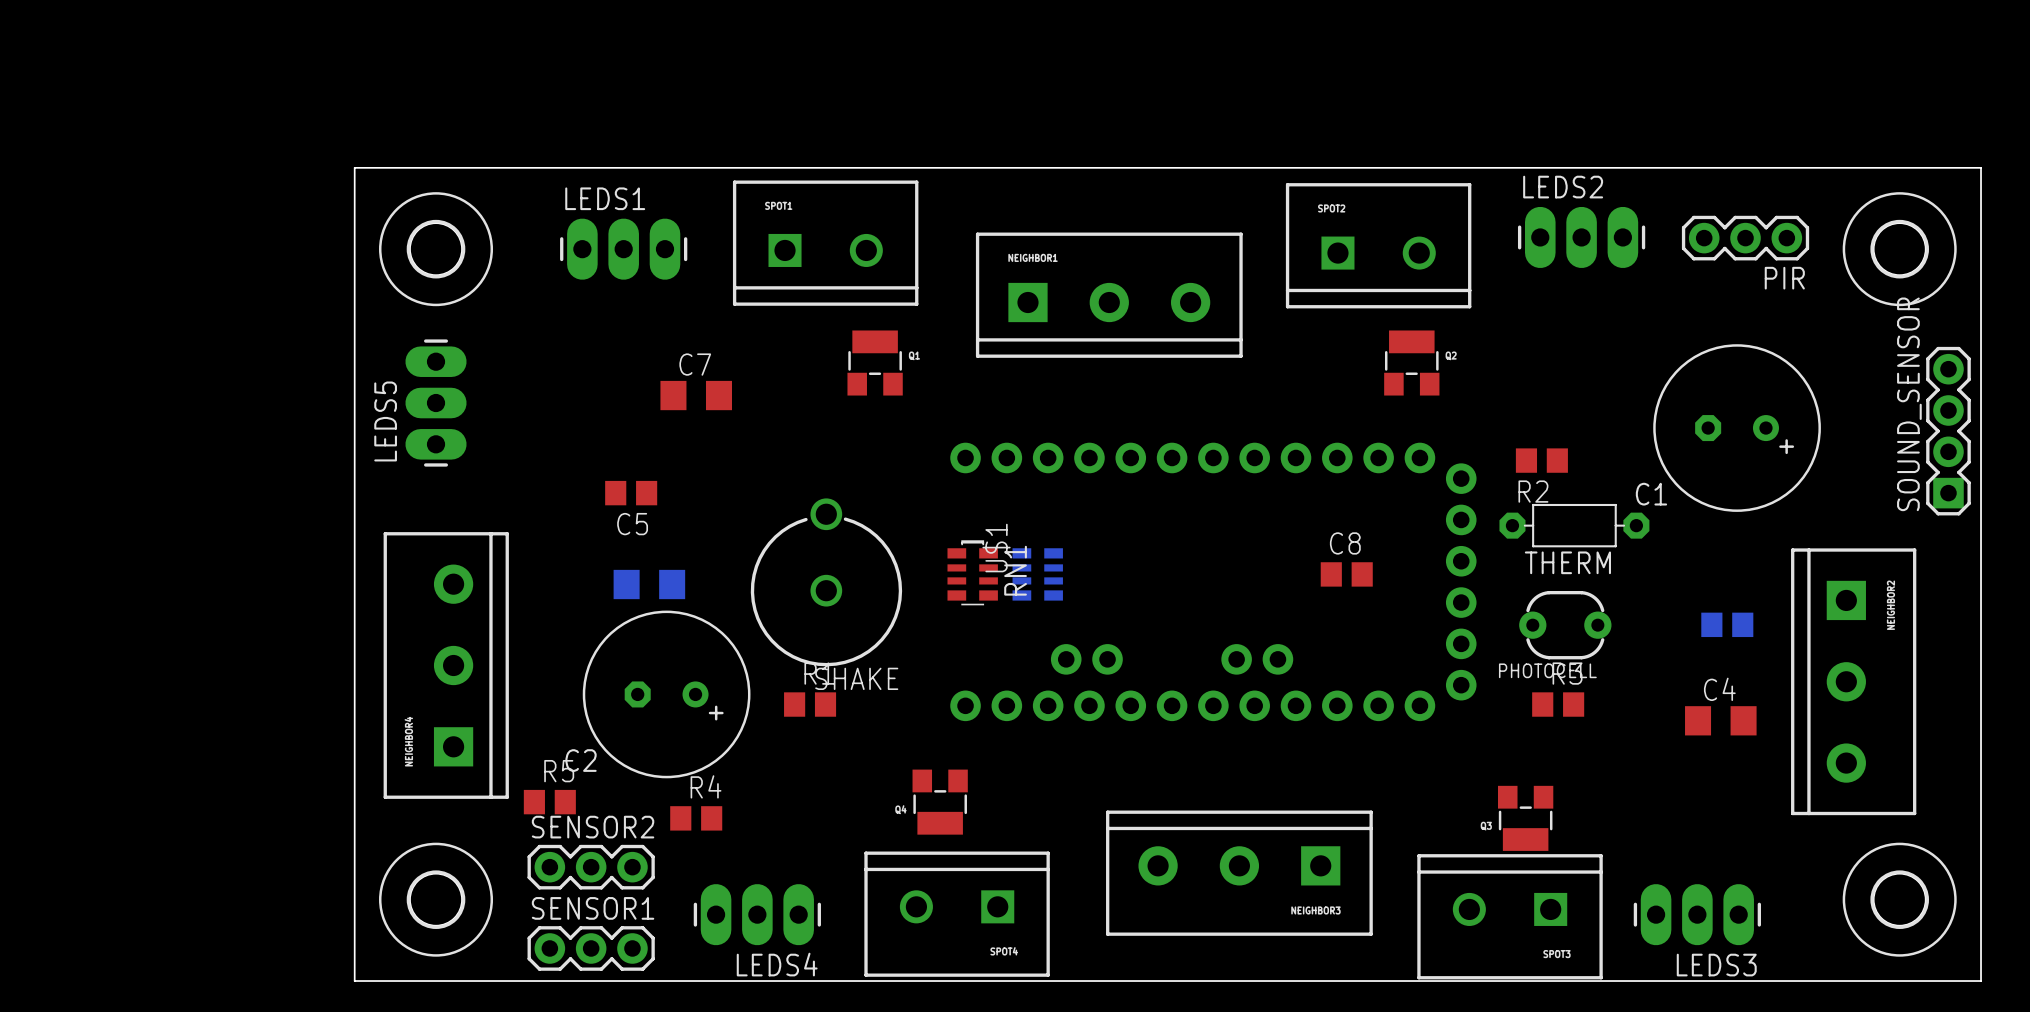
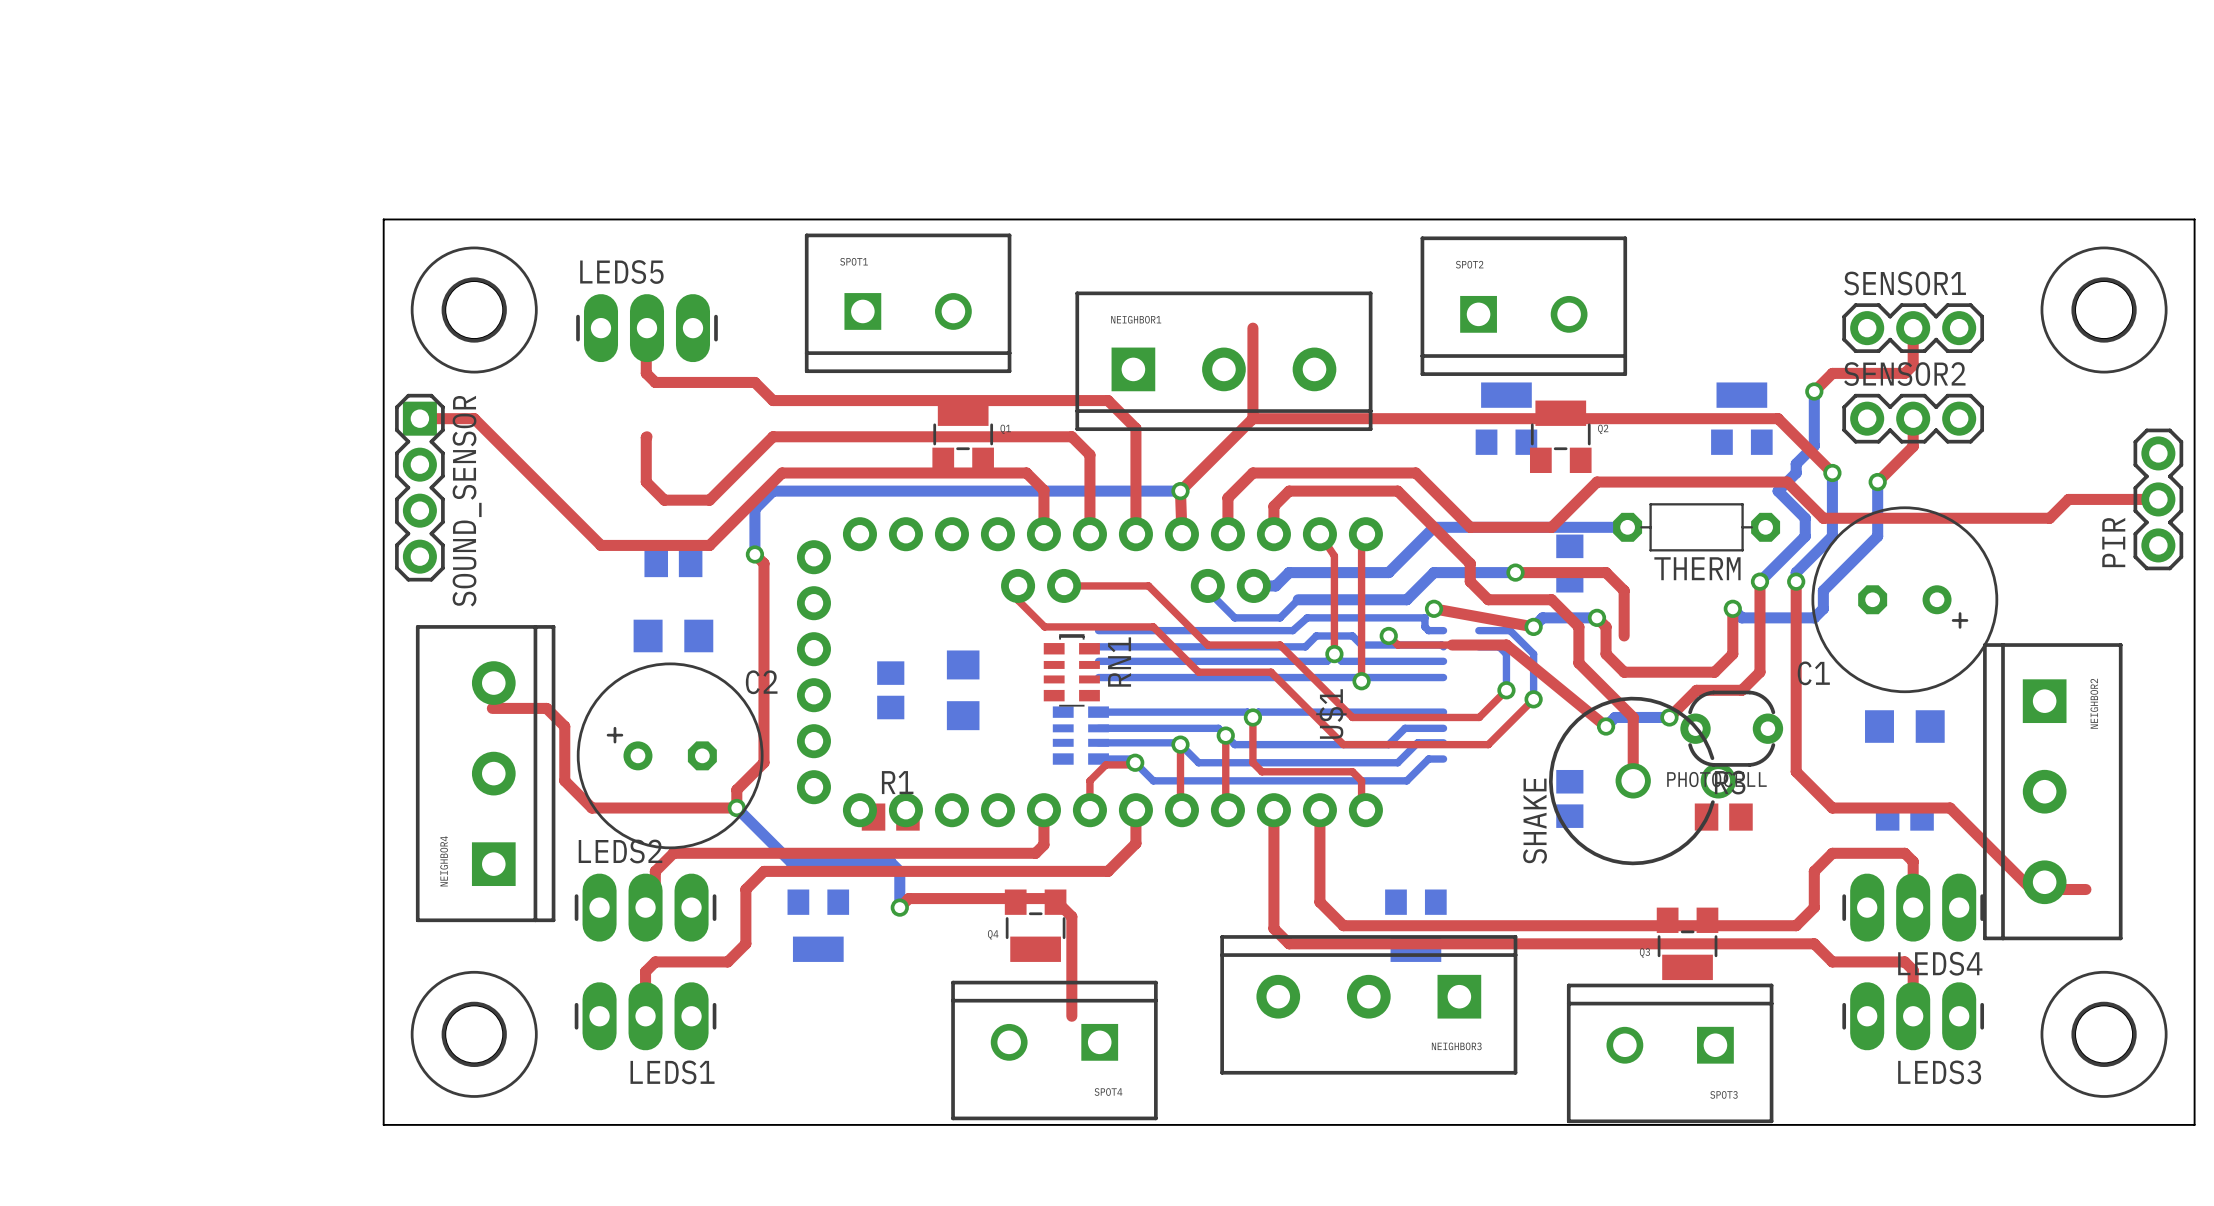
LEDS1 name position: LEDS1 (605, 198) -> LEDS1 (672, 1072)
LEDS2 position: (1581, 237) -> (645, 907)
PIR rotation: 0° (1745, 238) -> 90° clockwise (2158, 499)
PIR position: (1745, 238) -> (2158, 499)
LEDS1 position: (623, 249) -> (645, 1016)
top track: none -> (646, 328) (646, 373) (655, 382) (754, 382) (773, 400) (1108, 400) (1135, 428) (1135, 534)
top track: none -> (1252, 328) (1252, 418)
top track: none -> (1913, 328) (1913, 365) (1904, 373) (1832, 373) (1814, 391)
bottom track: none -> (1814, 391) (1814, 445) (1796, 463) (1796, 472) (1778, 491) (1805, 518) (1805, 536) (1759, 581)
via: none -> (1814, 391)
top track: none -> (419, 418) (474, 418) (601, 545) (709, 545) (782, 472) (1026, 472) (1043, 490) (1043, 534)
top track: none -> (1252, 418) (1778, 418) (1832, 472)
top track: none -> (1252, 418) (1180, 491) (1181, 534)
part: none -> (1506, 418)
part: none -> (1741, 418)
top track: none -> (1913, 418) (1913, 446) (1877, 482)
top track: none -> (646, 436) (646, 482) (664, 500) (709, 500) (773, 436) (1071, 436) (1089, 454) (1089, 534)
C7 side: top (696, 395) -> bottom (963, 690)
bottom track: none -> (1832, 472) (1832, 536) (1796, 572) (1796, 581)
via: none -> (1832, 472)
LEDS5 rotation: 0° (436, 403) -> 90° clockwise (646, 328)
LEDS5 position: (436, 403) -> (646, 328)
bottom track: none -> (1877, 482) (1877, 536) (1823, 590) (1823, 608) (1814, 617) (1741, 617) (1732, 608)
via: none -> (1877, 482)
SOUND_SENSOR: none -> (419, 487)
bottom track: none -> (1180, 491) (773, 491) (754, 509) (754, 554)
via: none -> (1180, 491)
top track: none -> (2158, 499) (2068, 499) (2049, 518) (1823, 518) (1787, 482) (1596, 482) (1551, 527) (1470, 527) (1415, 472) (1252, 472) (1227, 497) (1227, 534)
C1 position: (1737, 428) -> (1904, 599)
SOUND_SENSOR: (1948, 431) -> none
bottom track: none -> (1627, 527) (1434, 527) (1388, 572) (1289, 572) (1275, 585) (1253, 585)
top track: none -> (1273, 534) (1273, 506) (1289, 491) (1397, 491) (1470, 563) (1470, 581) (1488, 599) (1551, 599) (1578, 626) (1578, 663) (1633, 717) (1633, 780)
top track: none -> (1319, 534) (1334, 555) (1334, 654)
top track: none -> (1365, 534) (1361, 538) (1361, 681)
R2 side: top (1541, 460) -> bottom (1569, 563)
top track: none -> (754, 554) (763, 563) (763, 762) (736, 789) (736, 808) (591, 808) (564, 780) (564, 726) (546, 708) (492, 708)
via: none -> (754, 554)
top track: none -> (1515, 572) (1606, 572) (1624, 590) (1624, 635)
bottom track: none -> (1515, 572) (1434, 572) (1406, 599) (1298, 599) (1280, 617) (1234, 617) (1207, 590) (1207, 585)
via: none -> (1515, 572)
C5 side: top (631, 493) -> bottom (673, 563)
top track: none -> (1759, 581) (1759, 672) (1741, 690) (1696, 690) (1669, 717)
via: none -> (1759, 581)
top track: none -> (1796, 581) (1796, 771) (1832, 808) (1950, 808) (2031, 889) (2085, 889)
via: none -> (1796, 581)
top track: none -> (1018, 585) (1018, 600) (1044, 626) (1153, 626) (1198, 672) (1271, 672) (1343, 744) (1488, 744) (1533, 699)
top track: none -> (1064, 585) (1148, 585) (1207, 645) (1280, 645) (1352, 717) (1479, 717) (1506, 690)
top track: none -> (1434, 608) (1533, 626)
via: none -> (1434, 608)
top track: none -> (1732, 608) (1732, 654) (1714, 672) (1624, 672) (1606, 654) (1606, 626) (1596, 617)
via: none -> (1732, 608)
bottom track: none -> (1596, 617) (1542, 617) (1533, 626)
via: none -> (1596, 617)
THERM position: (1574, 525) -> (1696, 527)
via: none -> (1533, 626)
bottom track: none -> (1098, 630) (1292, 630) (1307, 617) (1424, 617) (1424, 626) (1428, 630) (1443, 630)
bottom track: none -> (1478, 630) (1510, 630) (1533, 654) (1533, 699)
top track: none -> (1388, 635) (1397, 645) (1506, 645) (1606, 726)
via: none -> (1388, 635)
bottom track: none -> (1098, 646) (1305, 646) (1316, 635) (1352, 635) (1361, 645) (1441, 645) (1443, 646)
bottom track: none -> (1478, 646) (1499, 646) (1506, 654) (1506, 690)
via: none -> (1334, 654)
bottom track: none -> (1098, 661) (1327, 661) (1334, 654) (1341, 661) (1443, 661)
part position: (1037, 574) -> (1080, 735)
C8: (1346, 574) -> none
bottom track: none -> (1098, 677) (1356, 677) (1361, 681) (1366, 677) (1443, 677)
U$1 rotation: 0° (1213, 581) -> 180° (1089, 672)
SHAKE: (826, 582) -> none
via: none -> (1361, 681)
part position: (649, 584) -> (673, 635)
part: none -> (890, 690)
via: none -> (1506, 690)
via: none -> (1533, 699)
bottom track: none -> (1098, 712) (1247, 712) (1252, 717) (1258, 712) (1443, 712)
part footprint: [1701, 612, 1754, 638] -> [1865, 710, 1945, 743]
top track: none -> (1252, 717) (1252, 762) (1261, 771) (1352, 771) (1361, 780) (1361, 805) (1365, 810)
via: none -> (1252, 717)
bottom track: none -> (1669, 717) (1615, 717) (1606, 726)
via: none -> (1669, 717)
via: none -> (1606, 726)
bottom track: none -> (1098, 728) (1218, 728) (1234, 744) (1388, 744) (1405, 728) (1443, 728)
top track: none -> (1225, 735) (1225, 808) (1227, 810)
via: none -> (1225, 735)
bottom track: none -> (1098, 742) (1178, 742) (1198, 762) (1397, 762) (1417, 742) (1443, 742)
top track: none -> (1180, 744) (1181, 810)
via: none -> (1180, 744)
bottom track: none -> (1098, 759) (1131, 759) (1153, 780) (1406, 780) (1428, 759) (1443, 759)
top track: none -> (1135, 762) (1135, 764) (1105, 764) (1089, 780) (1089, 810)
via: none -> (1135, 762)
SHAKE: none -> (1642, 781)
part: none -> (1569, 798)
C2 rotation: 0° (666, 694) -> 180° (670, 755)
bottom track: none -> (736, 808) (791, 862) (890, 862) (899, 871) (899, 907)
via: none -> (736, 808)
top track: none -> (1043, 810) (1043, 844) (1035, 853) (673, 853) (655, 871) (655, 897) (645, 907)
top track: none -> (1135, 810) (1135, 843) (1108, 871) (763, 871) (745, 889) (745, 943) (727, 961) (655, 961) (645, 971) (645, 1016)
top track: none -> (1273, 810) (1273, 928) (1289, 943) (1814, 943) (1832, 961) (1904, 961) (1913, 970) (1913, 1016)
top track: none -> (1319, 810) (1319, 902) (1343, 925) (1796, 925) (1814, 907) (1814, 871) (1832, 853) (1904, 853) (1913, 861) (1913, 907)
part: none -> (1904, 817)
C4: (1720, 720) -> none
top track: none -> (899, 907) (908, 898) (1053, 898) (1071, 916) (1071, 1016)
via: none -> (899, 907)
R5: (549, 802) -> none
part: none -> (818, 925)
part: none -> (1415, 925)
R4: (696, 818) -> none
SENSOR2 position: (591, 867) -> (1913, 418)
LEDS4 position: (757, 914) -> (1913, 907)
LEDS3 position: (1697, 914) -> (1913, 1016)
SENSOR1 position: (591, 948) -> (1913, 328)

